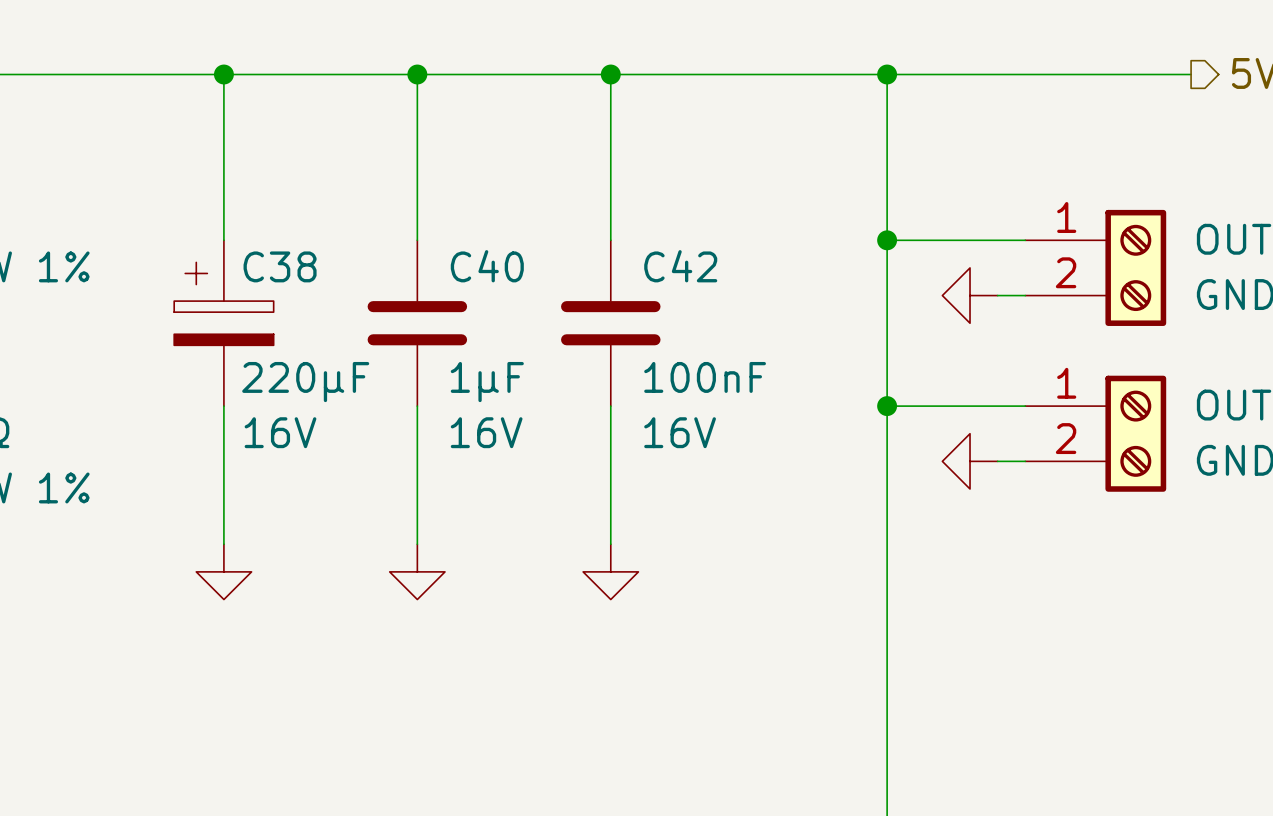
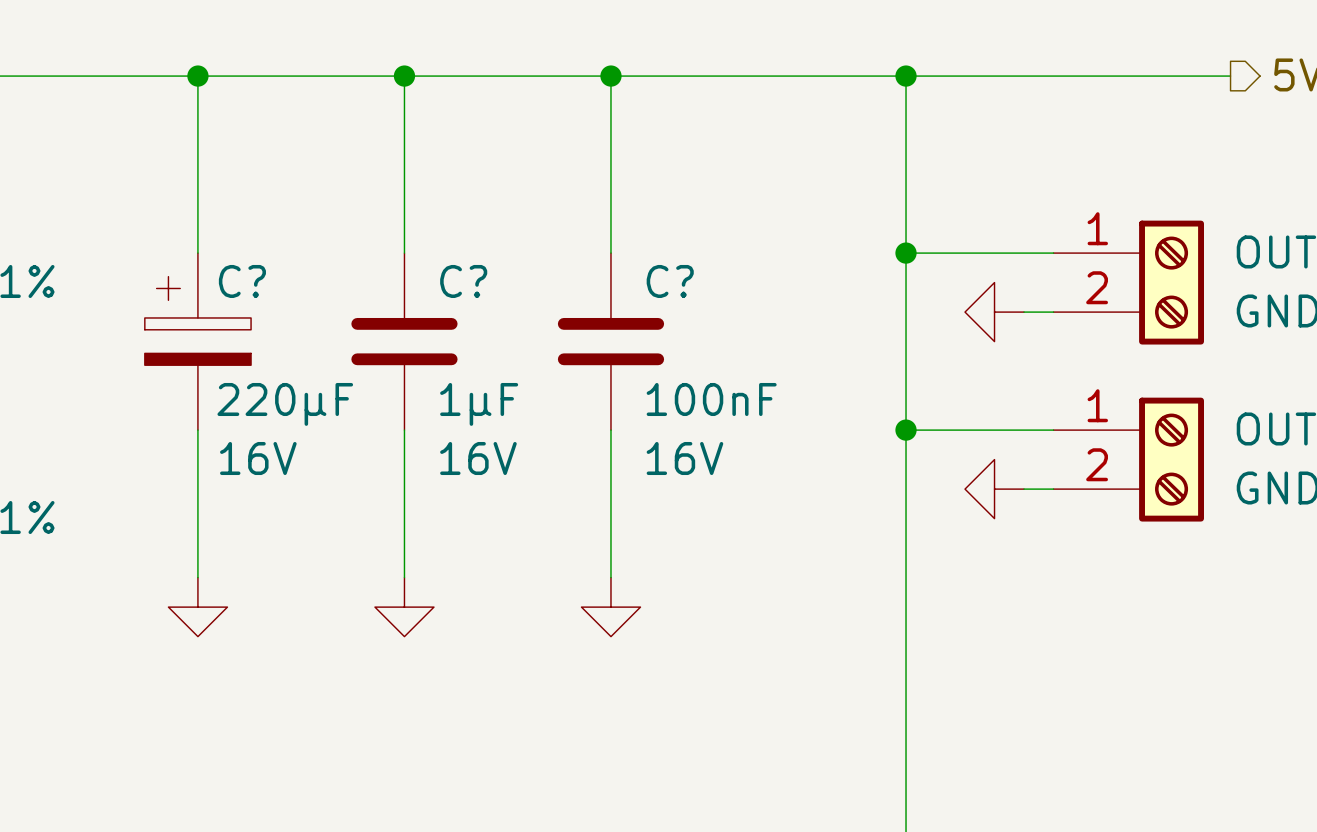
C38 name: C38 (280, 266) -> C? (242, 281)
C40 name: C40 (487, 266) -> C? (463, 281)
C42 name: C42 (680, 266) -> C? (670, 281)

